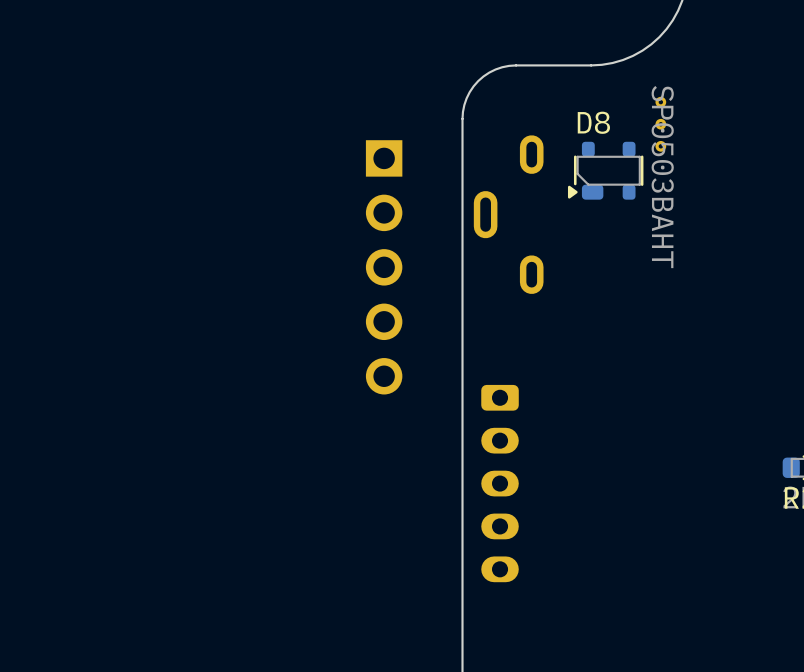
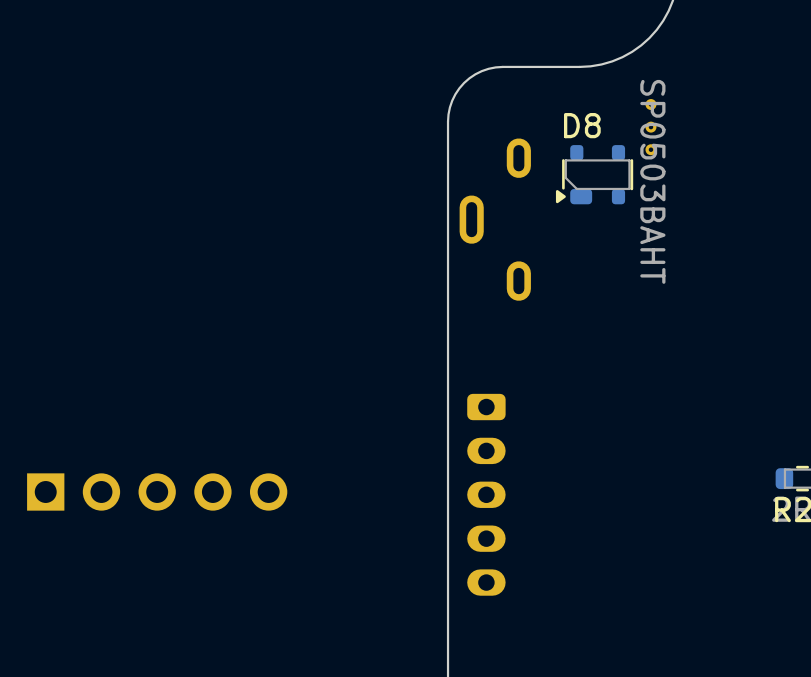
part rotation: 0° (384, 267) -> 90° counterclockwise (157, 492)
part position: (384, 267) -> (157, 492)

